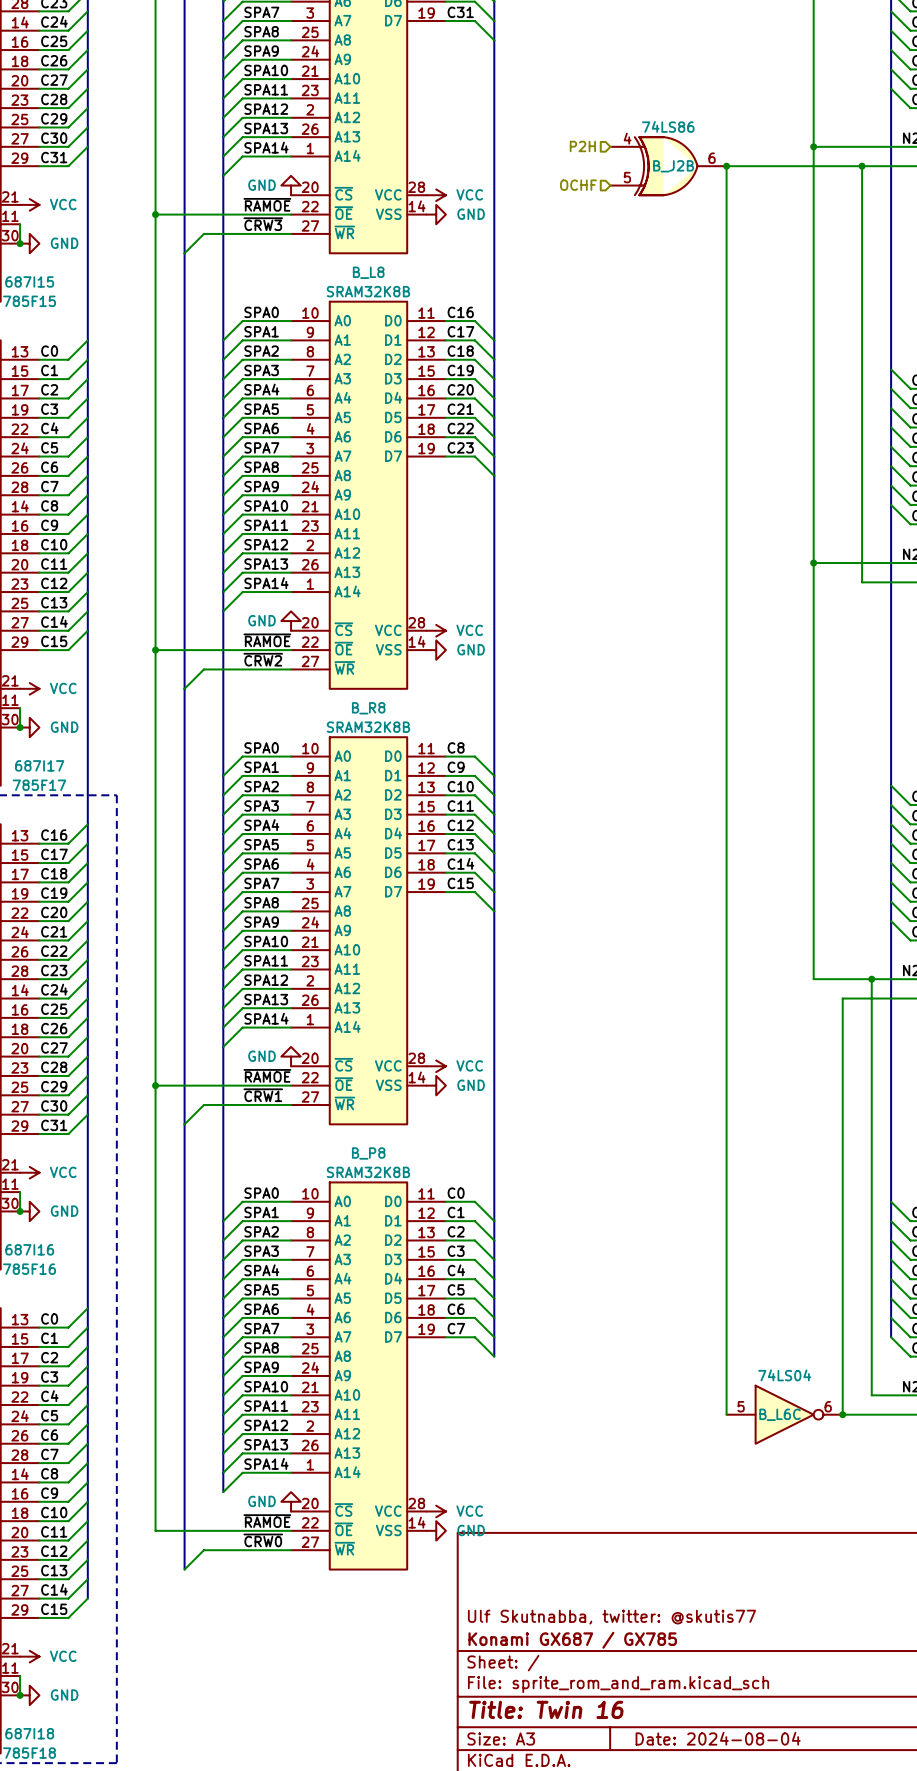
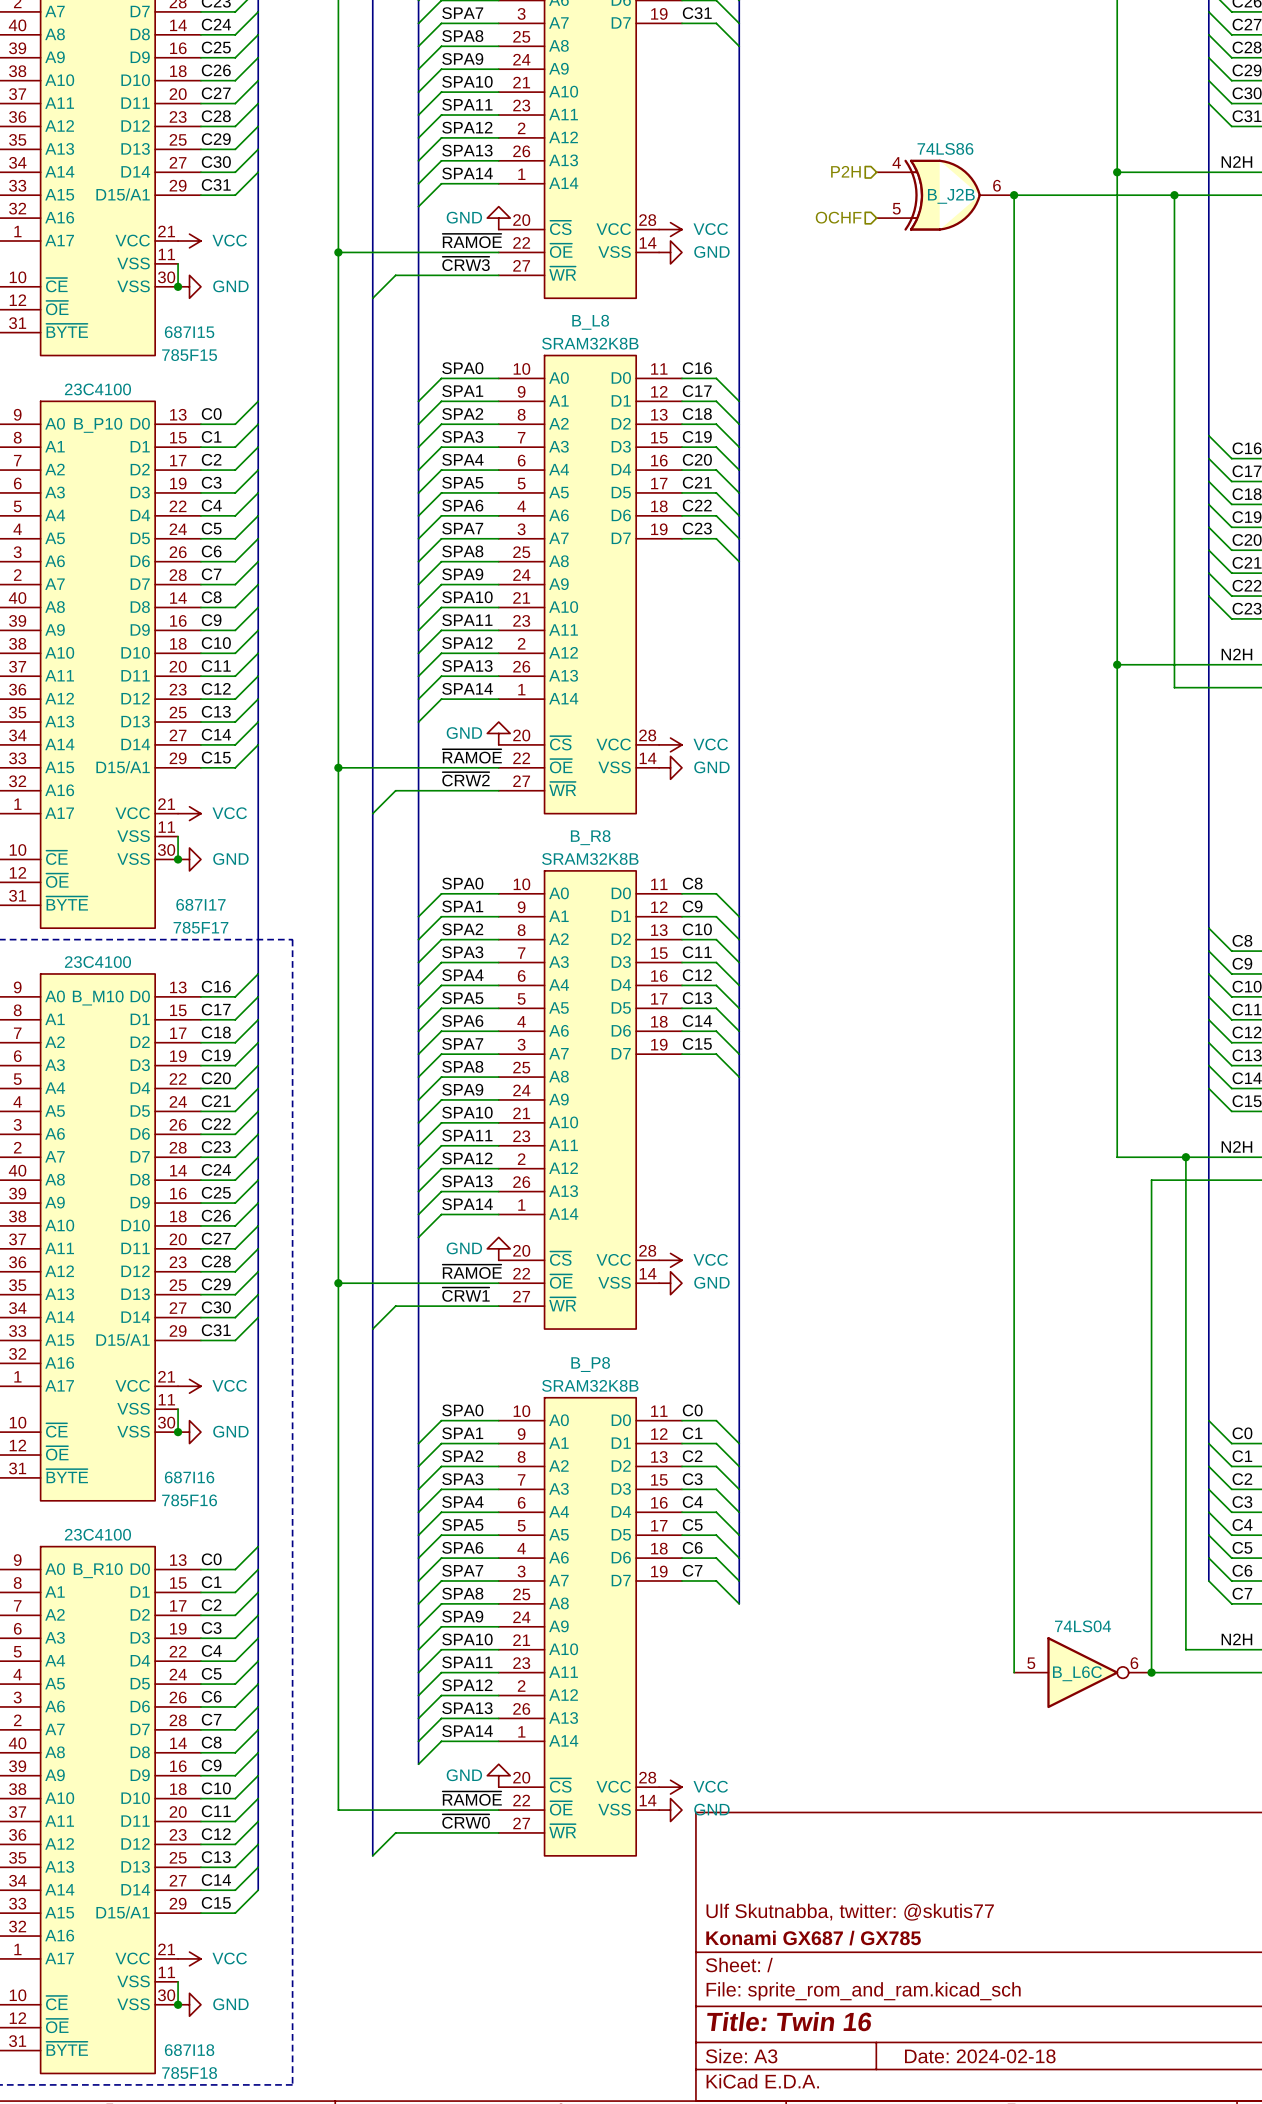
title block: Date: 2024-08-04 (718, 1738) -> Date: 2024-02-18 (980, 2056)

